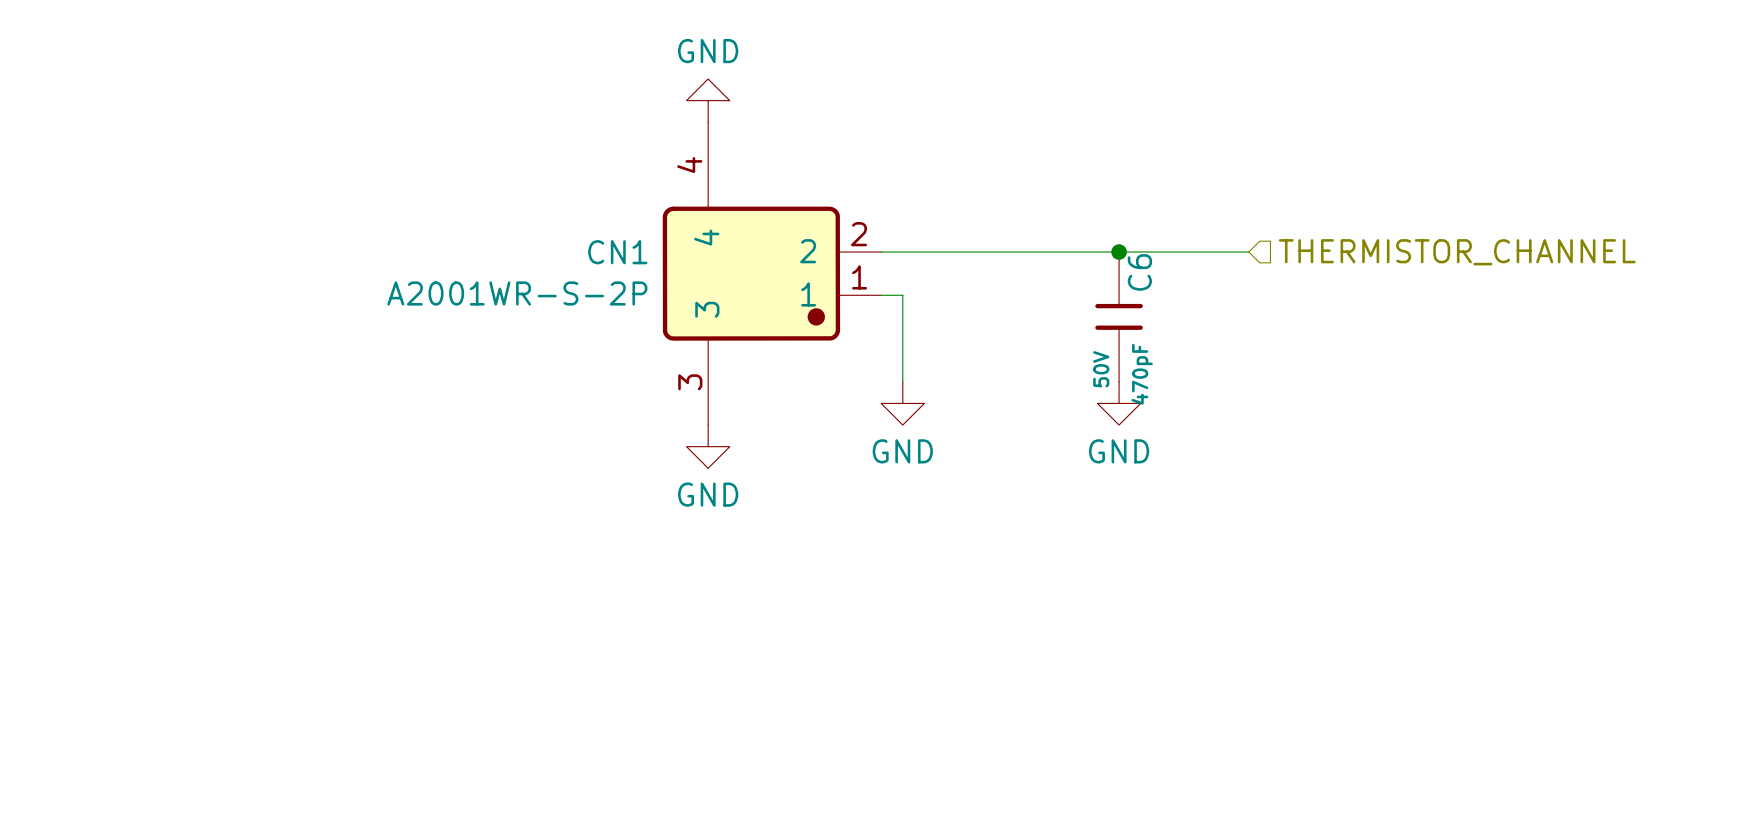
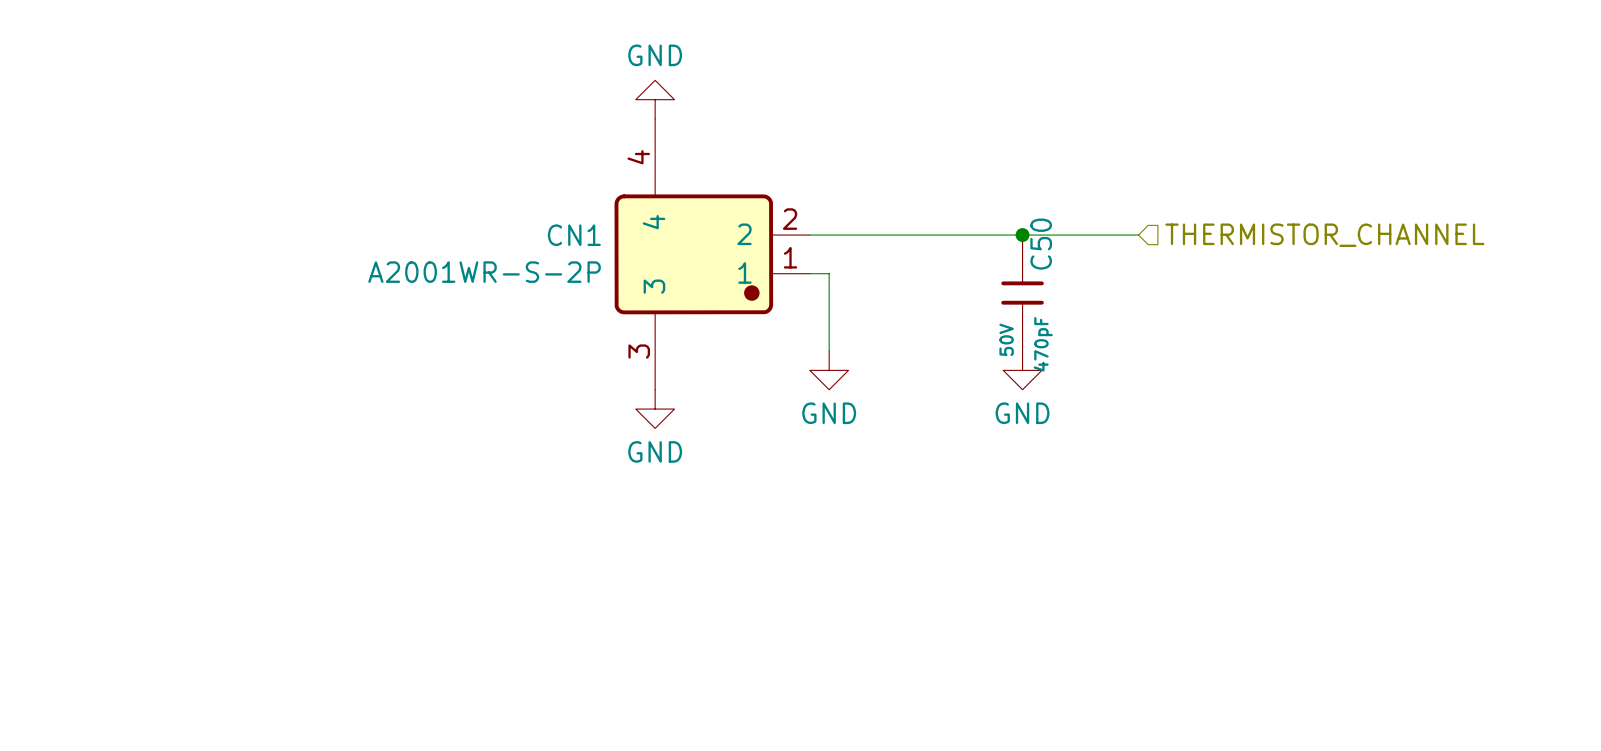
C6 name: C6 (1139, 272) -> C50 (1041, 244)

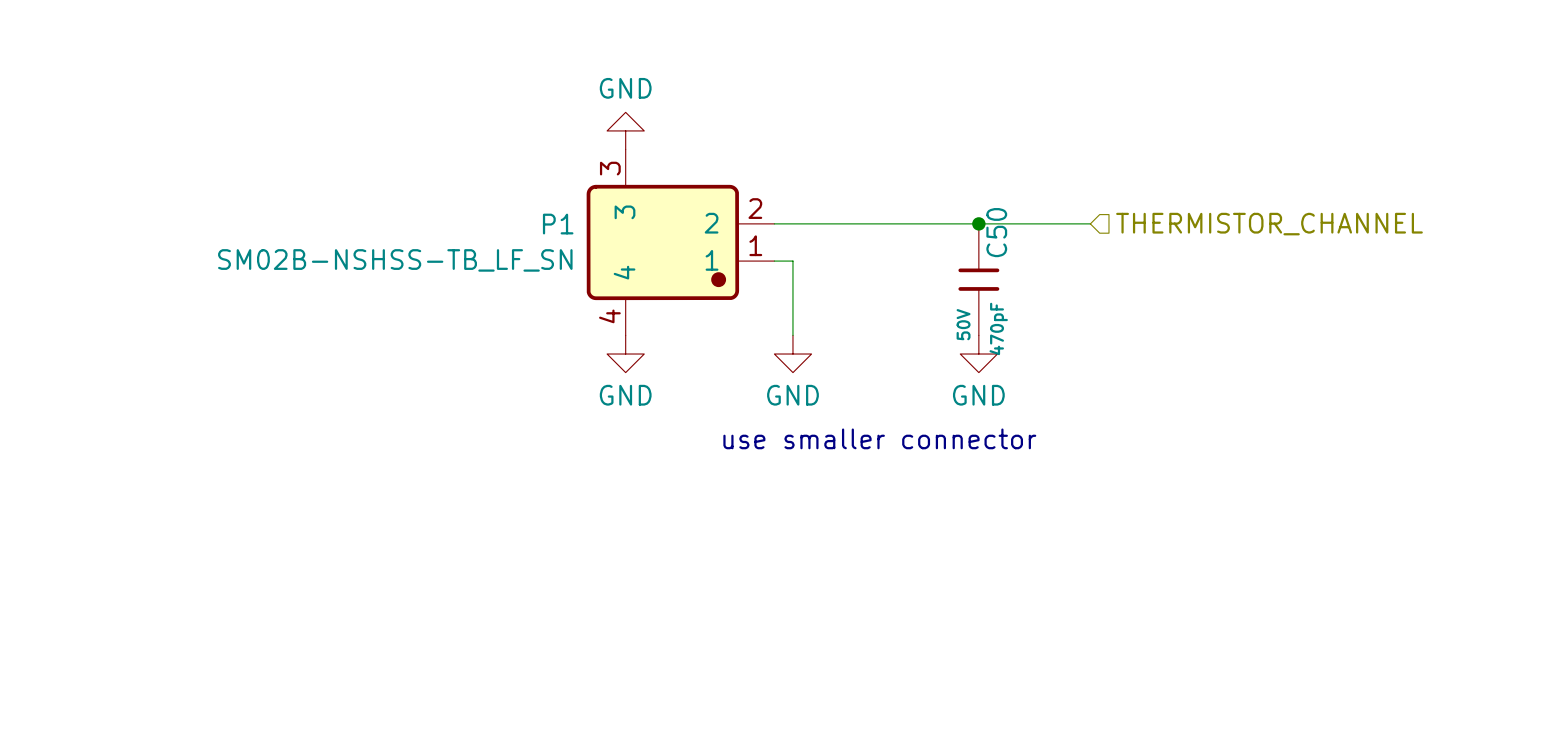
power symbol position: GND (655, 99) -> GND (625, 130)
CN1: A2001WR-S-2P (712, 254) -> none
P1: none -> SM02B-NSHSS-TB_LF_SN (680, 242)
power symbol position: GND (655, 409) -> GND (625, 354)
text: none -> use smaller connector (879, 438)

